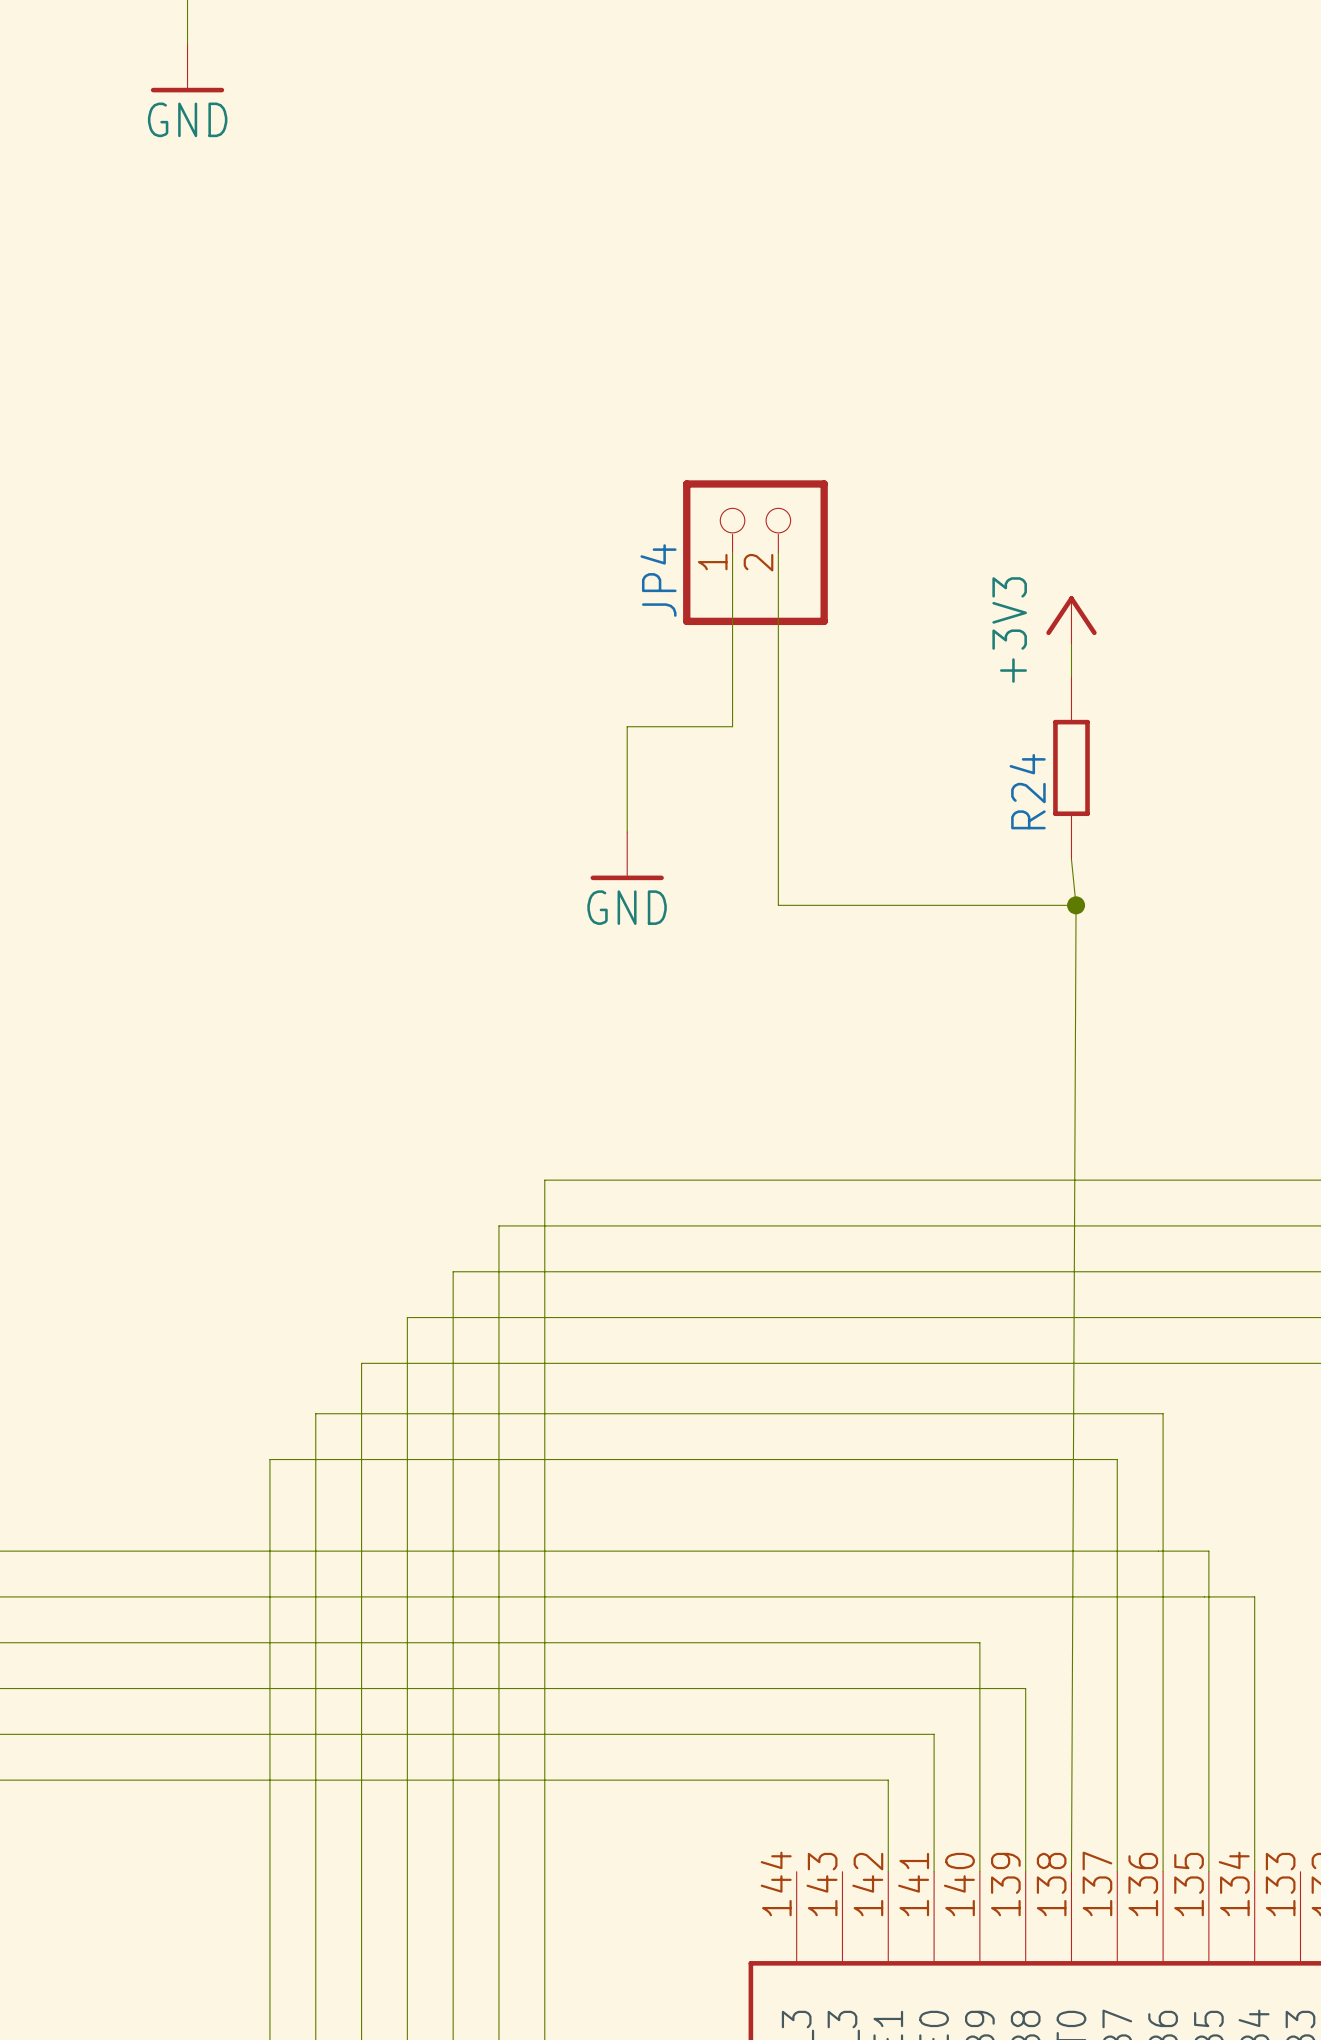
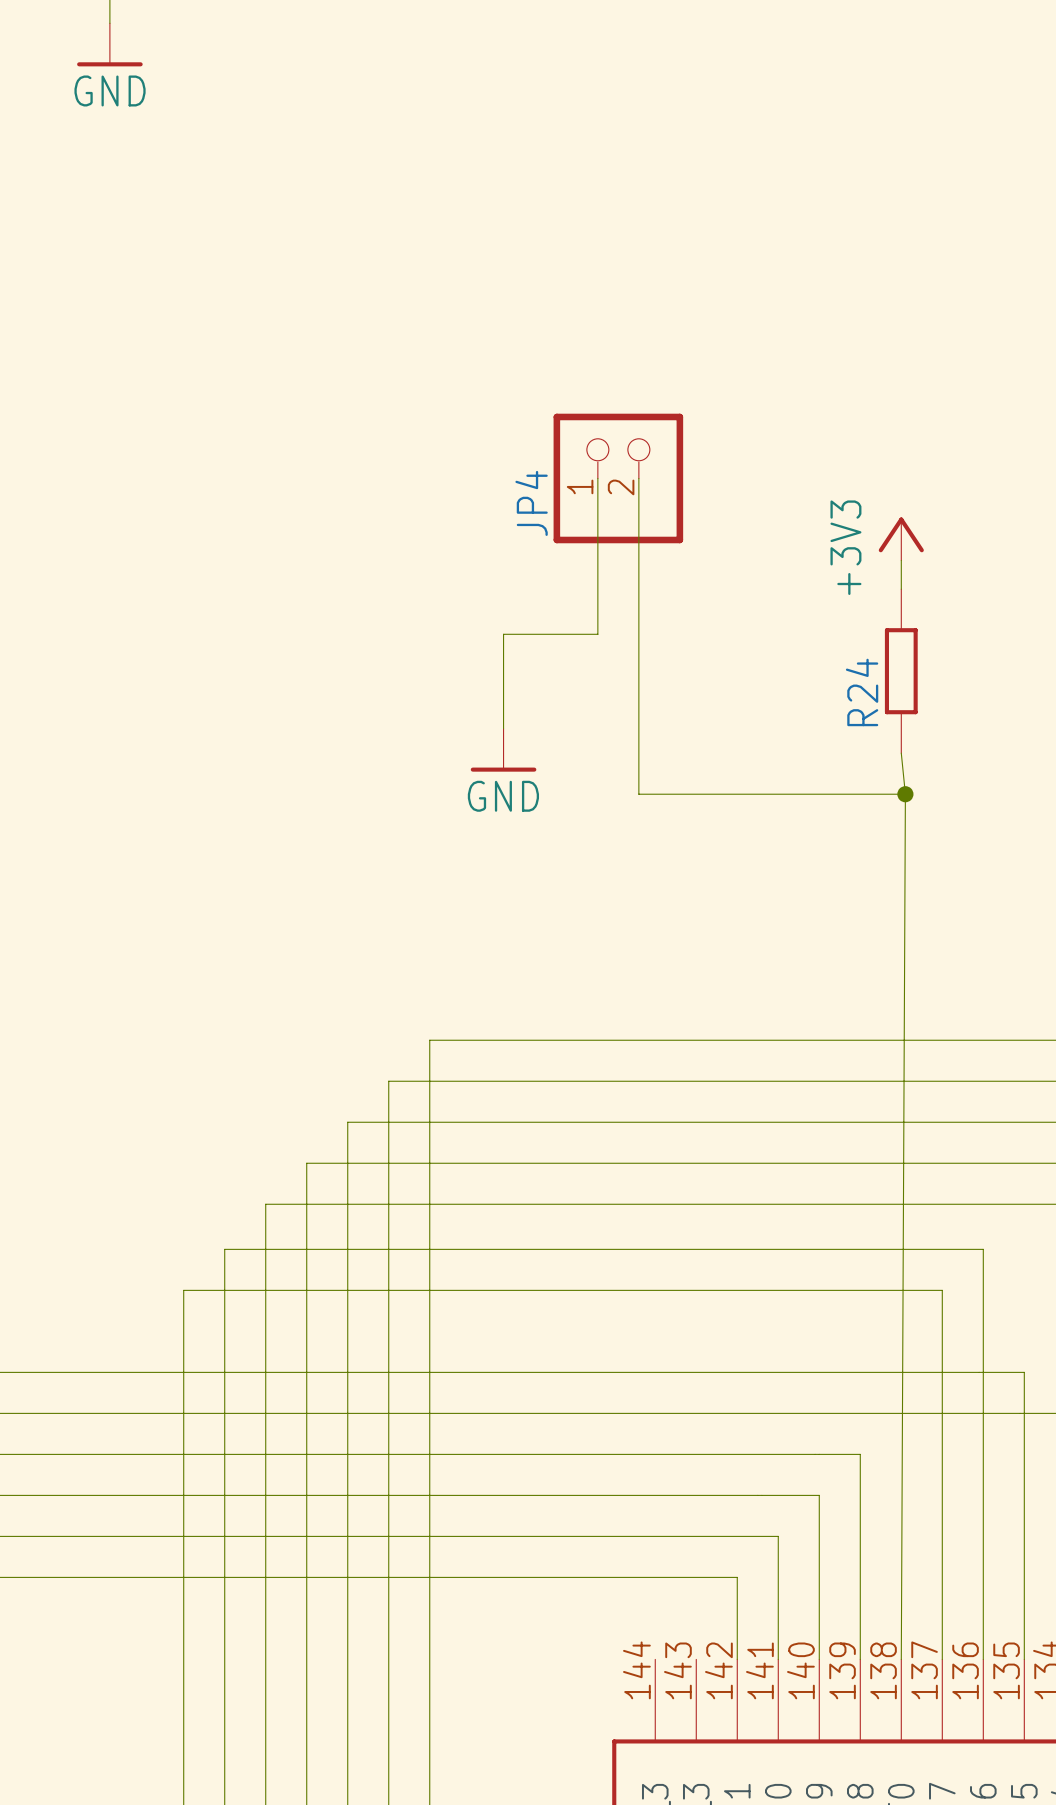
wire: (979, 1642) (979, 1688) (1025, 1688) -> (819, 1454) (860, 1454) (860, 1495)

